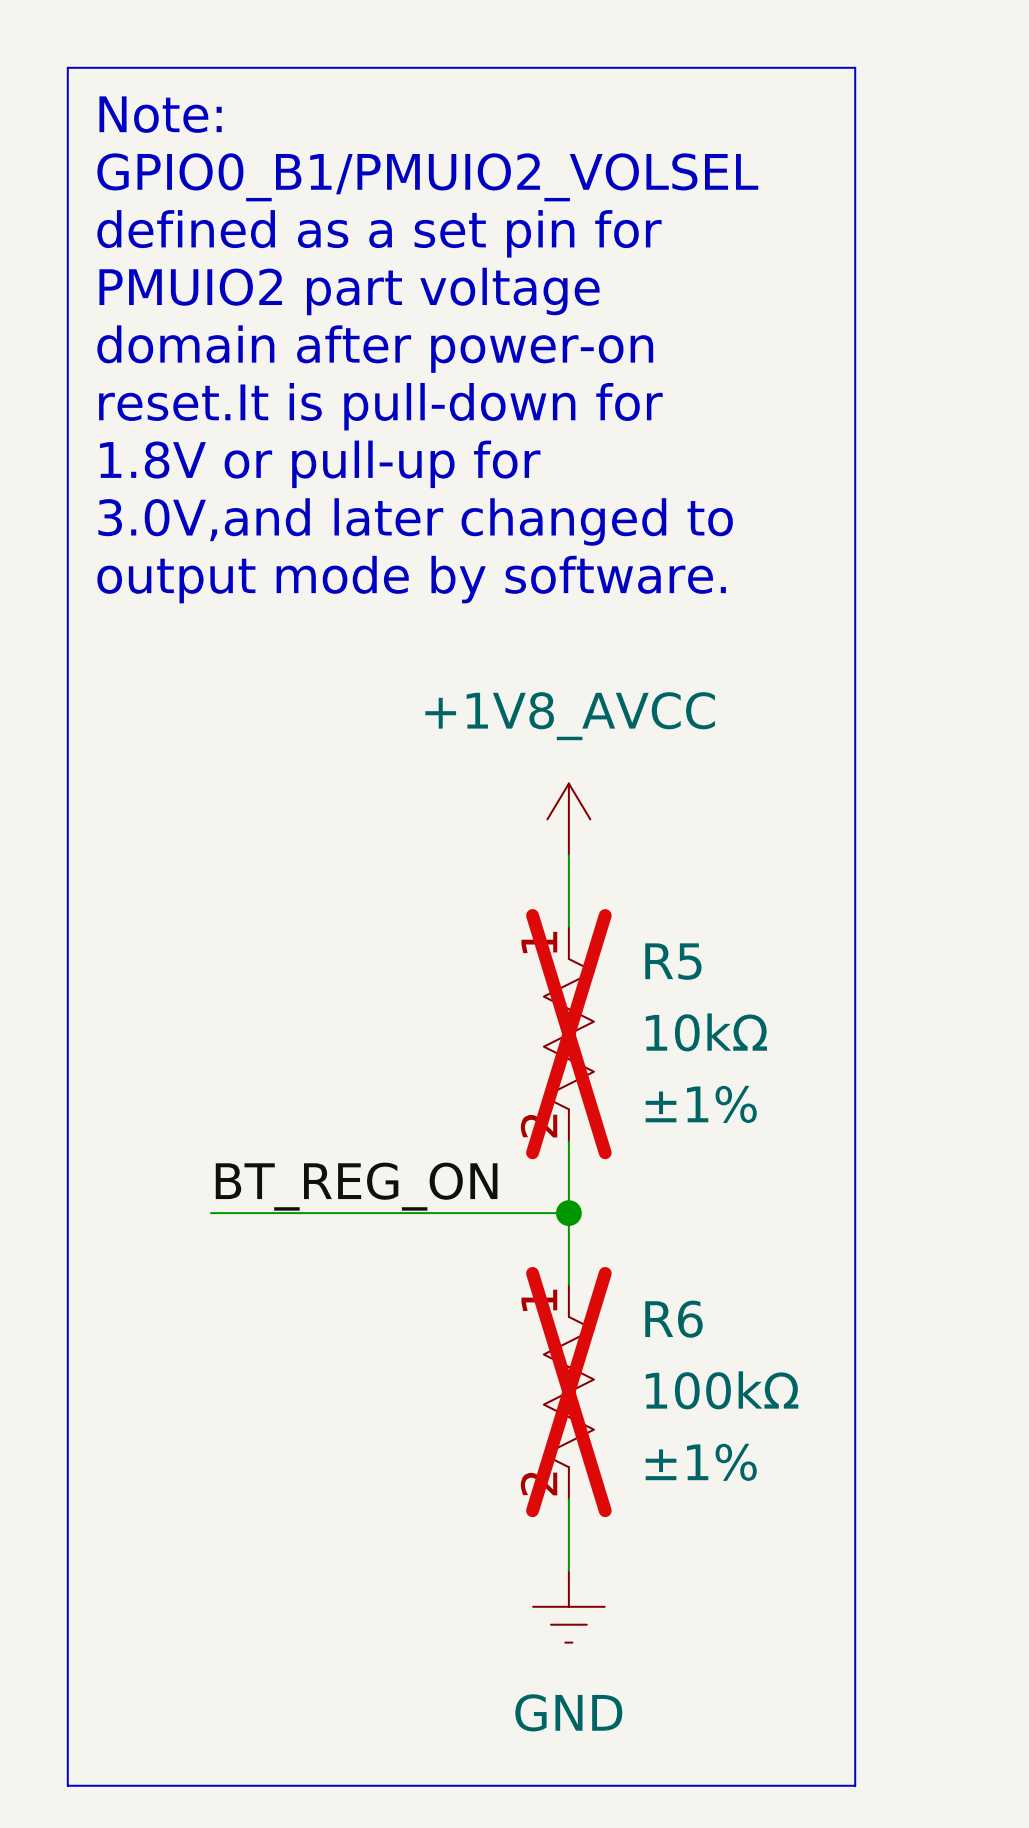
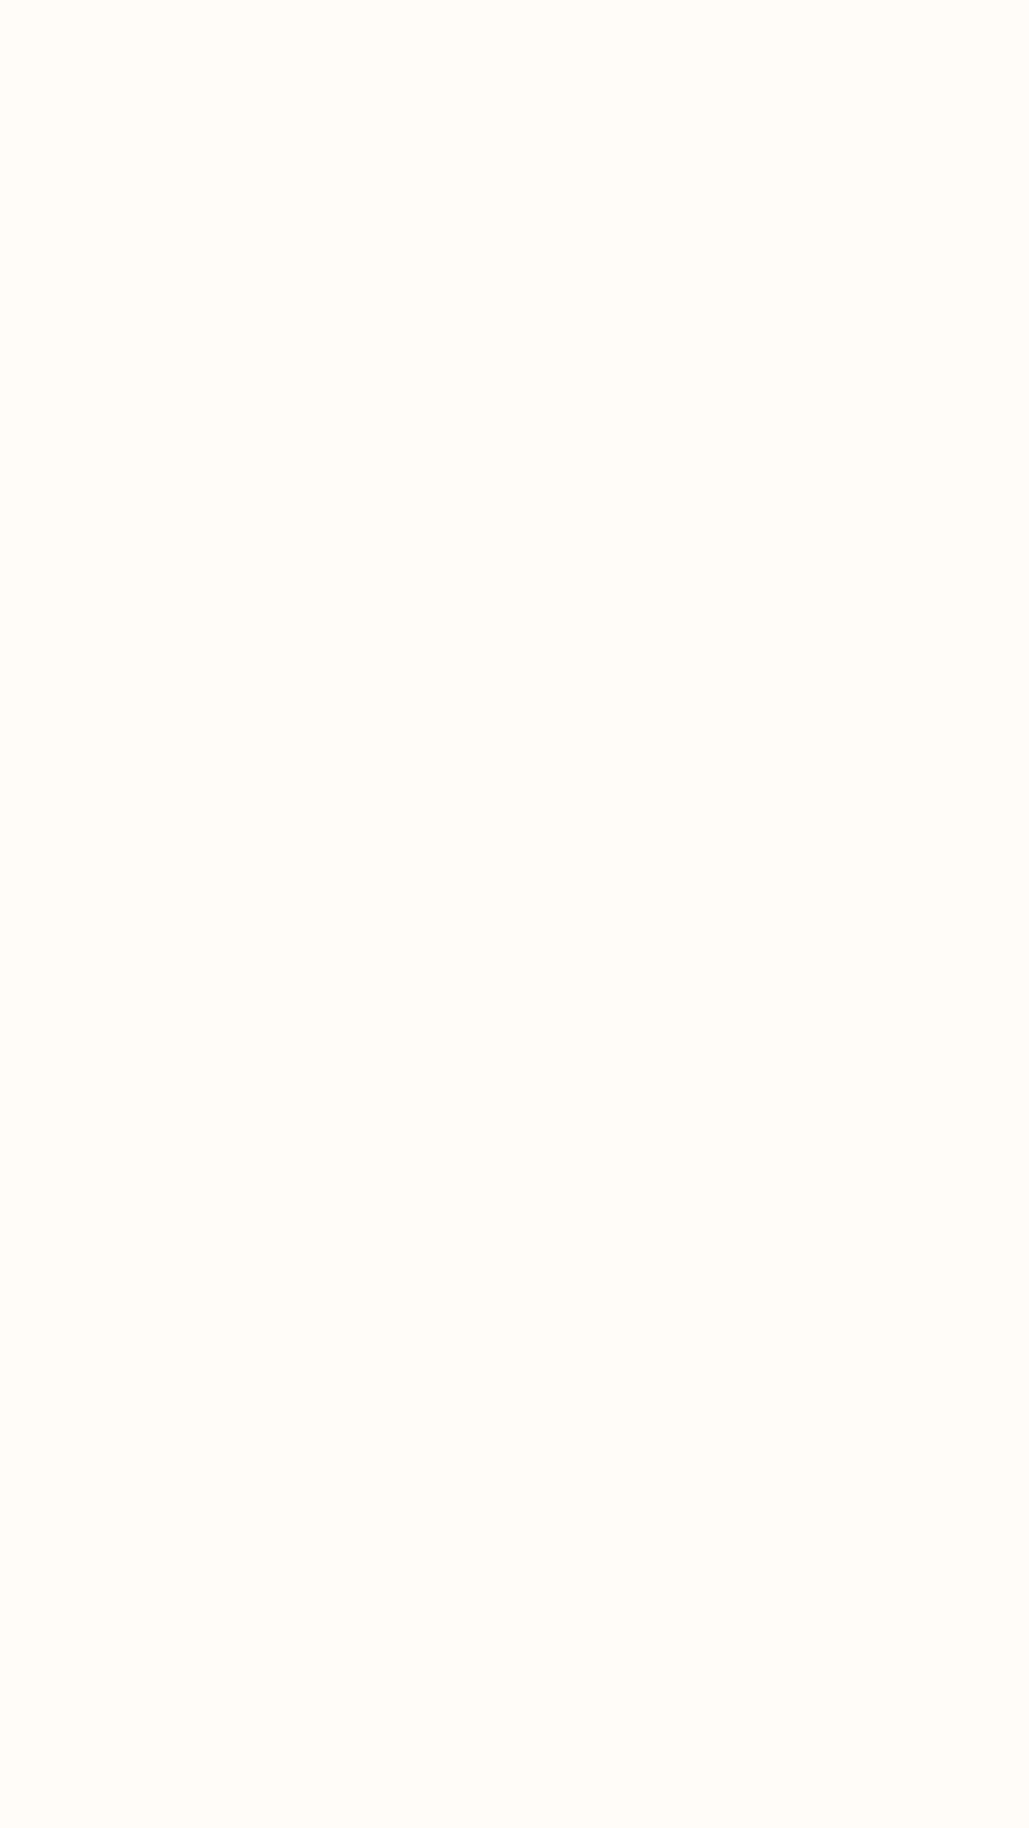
line: (67, 67) (855, 67) (855, 1785) (67, 1785) (67, 67) -> none
text: Note: (160, 114) -> none
text: GPIO0_B1/PMUIO2_VOLSEL (427, 177) -> none
text: defined as a set pin for (379, 233) -> none
text: PMUIO2 part voltage (349, 291) -> none
text: domain after power-on (375, 349) -> none
text: reset.It is pull-down for (380, 406) -> none
text: 1.8V or pull-up for (320, 464) -> none
text: 3.0V,and later changed to (415, 521) -> none
text: output mode by software. (411, 579) -> none
power symbol: +1V8_AVCC (568, 819) -> none
wire: (568, 855) (568, 926) -> none
R5: (568, 1034) -> none
wire: (568, 1141) (568, 1284) -> none
label: BT_REG_ON (356, 1186) -> none
wire: (210, 1213) (568, 1213) -> none
junction: (568, 1213) -> none
R6: (568, 1392) -> none
wire: (568, 1499) (568, 1571) -> none
power symbol: GND (568, 1606) -> none

